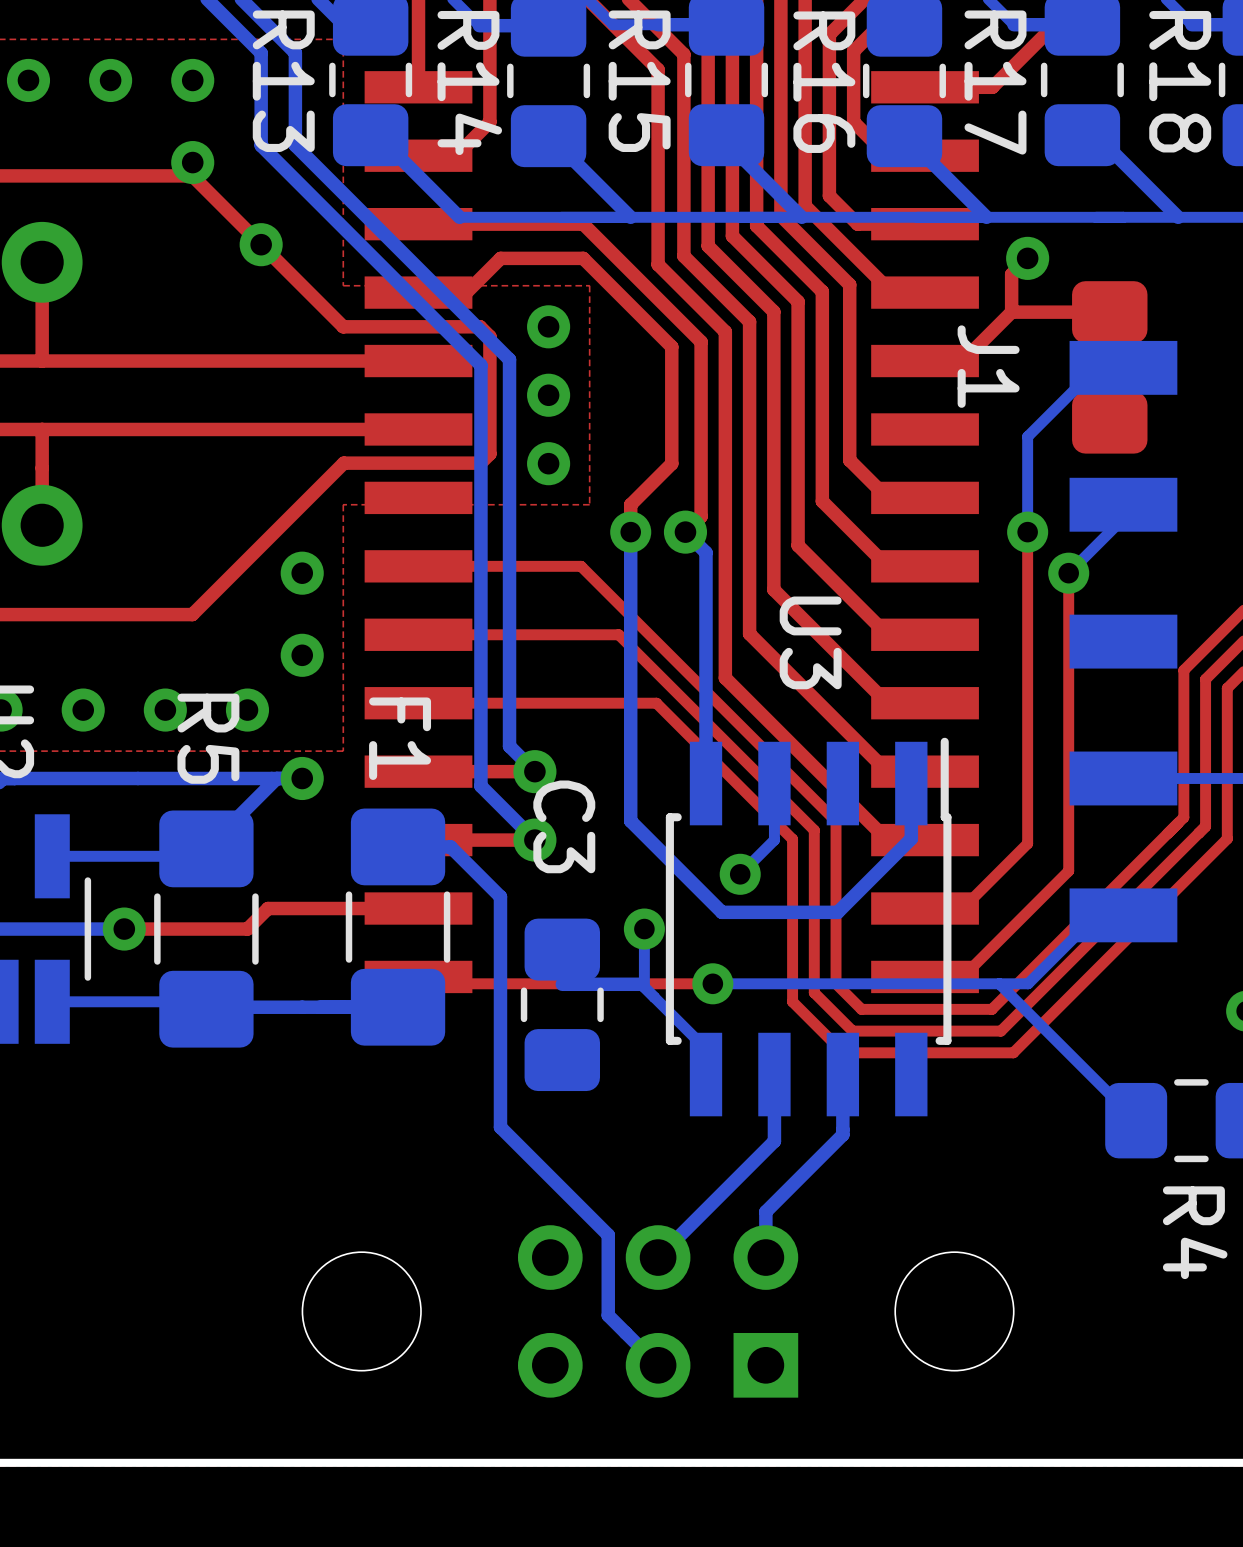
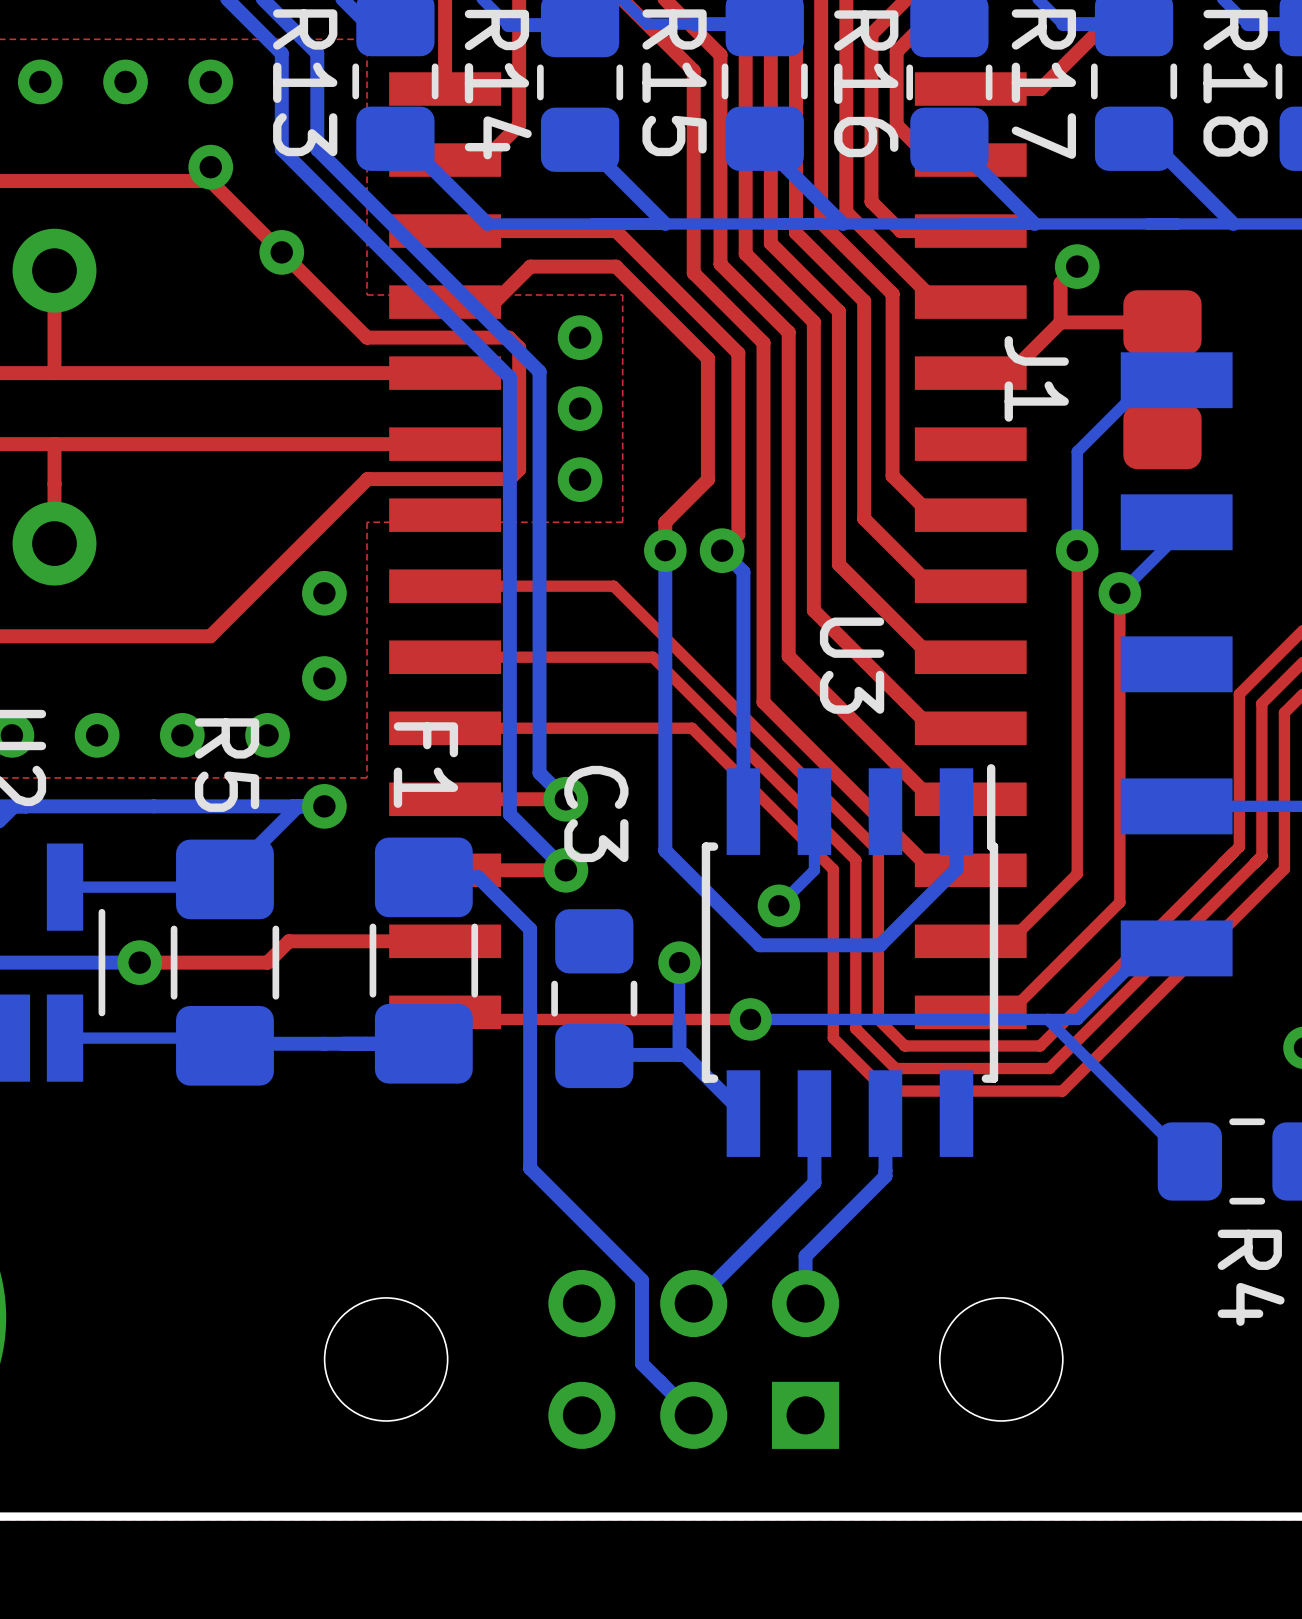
bottom track: (562, 984) (641, 984) (706, 1048) -> none
bottom track: none -> (679, 1023) (679, 1054)
C3 position: (562, 1004) -> (594, 998)
bottom track: none -> (594, 1055) (684, 1054) (743, 1113) (738, 1113)

